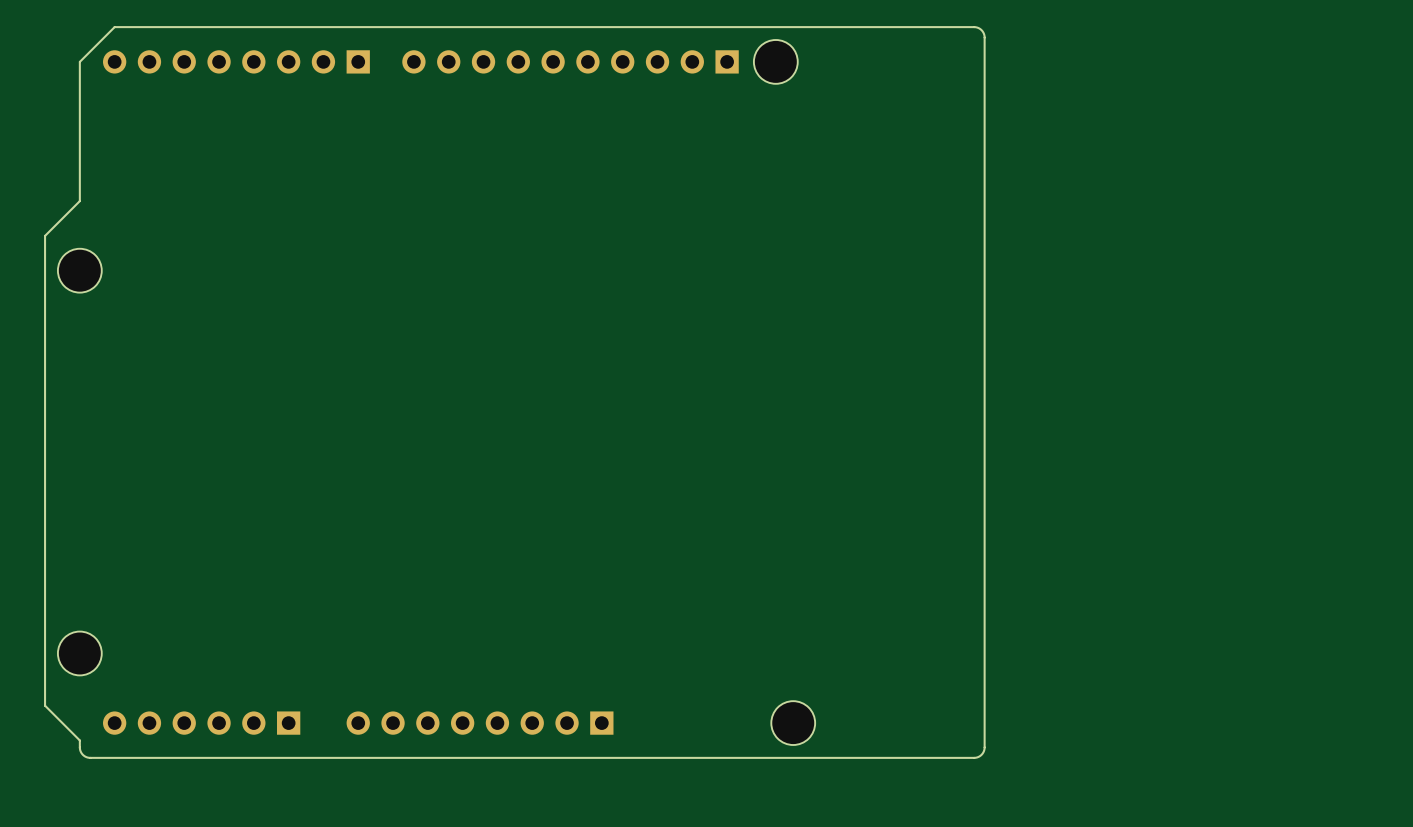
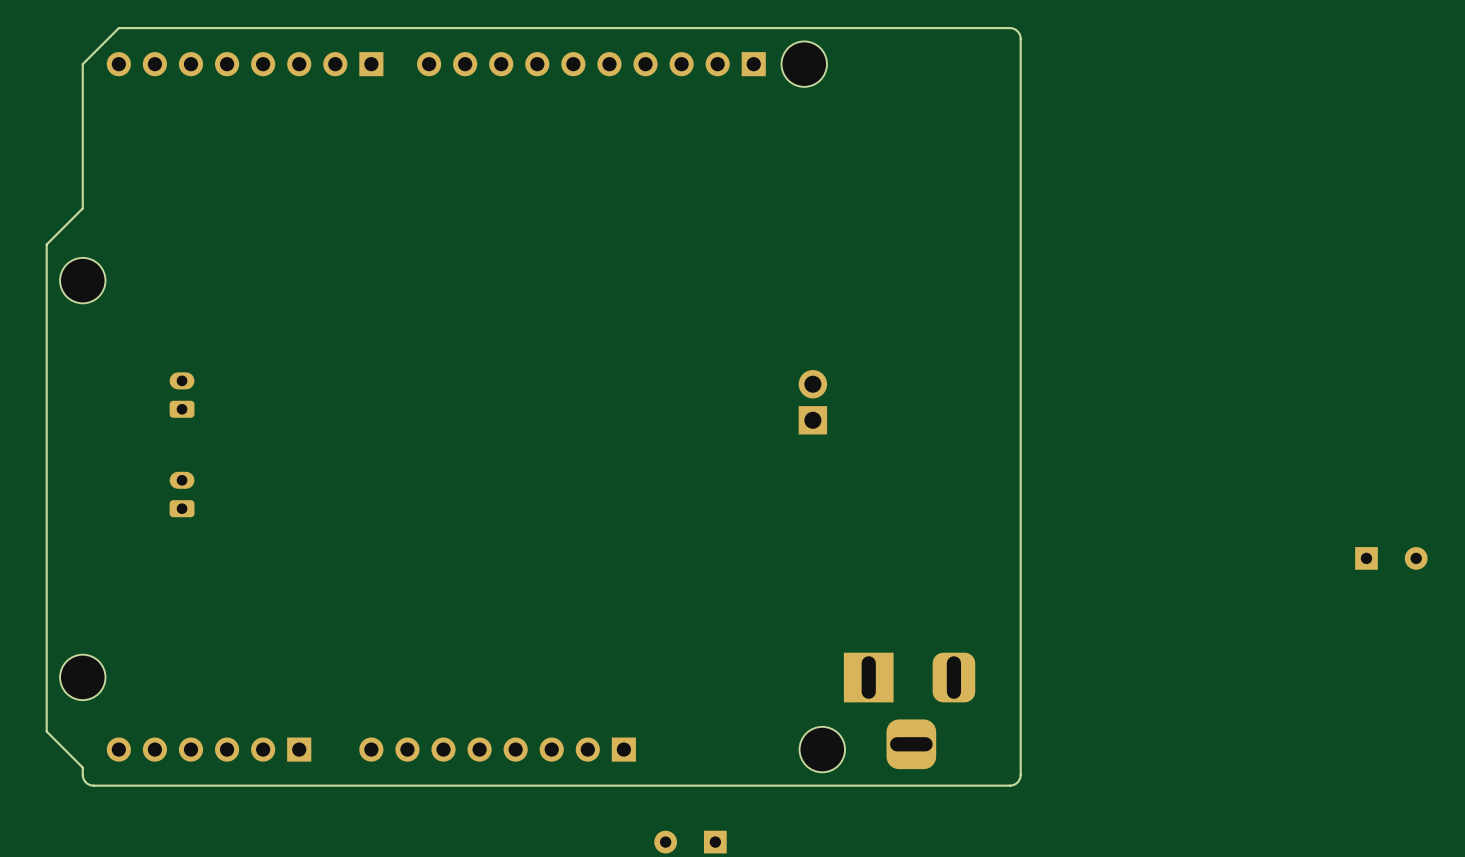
part: none -> (182, 395)
part: none -> (812, 402)
part: none -> (182, 494)
part: none -> (1391, 558)
part: none -> (909, 710)
part: none -> (690, 842)

